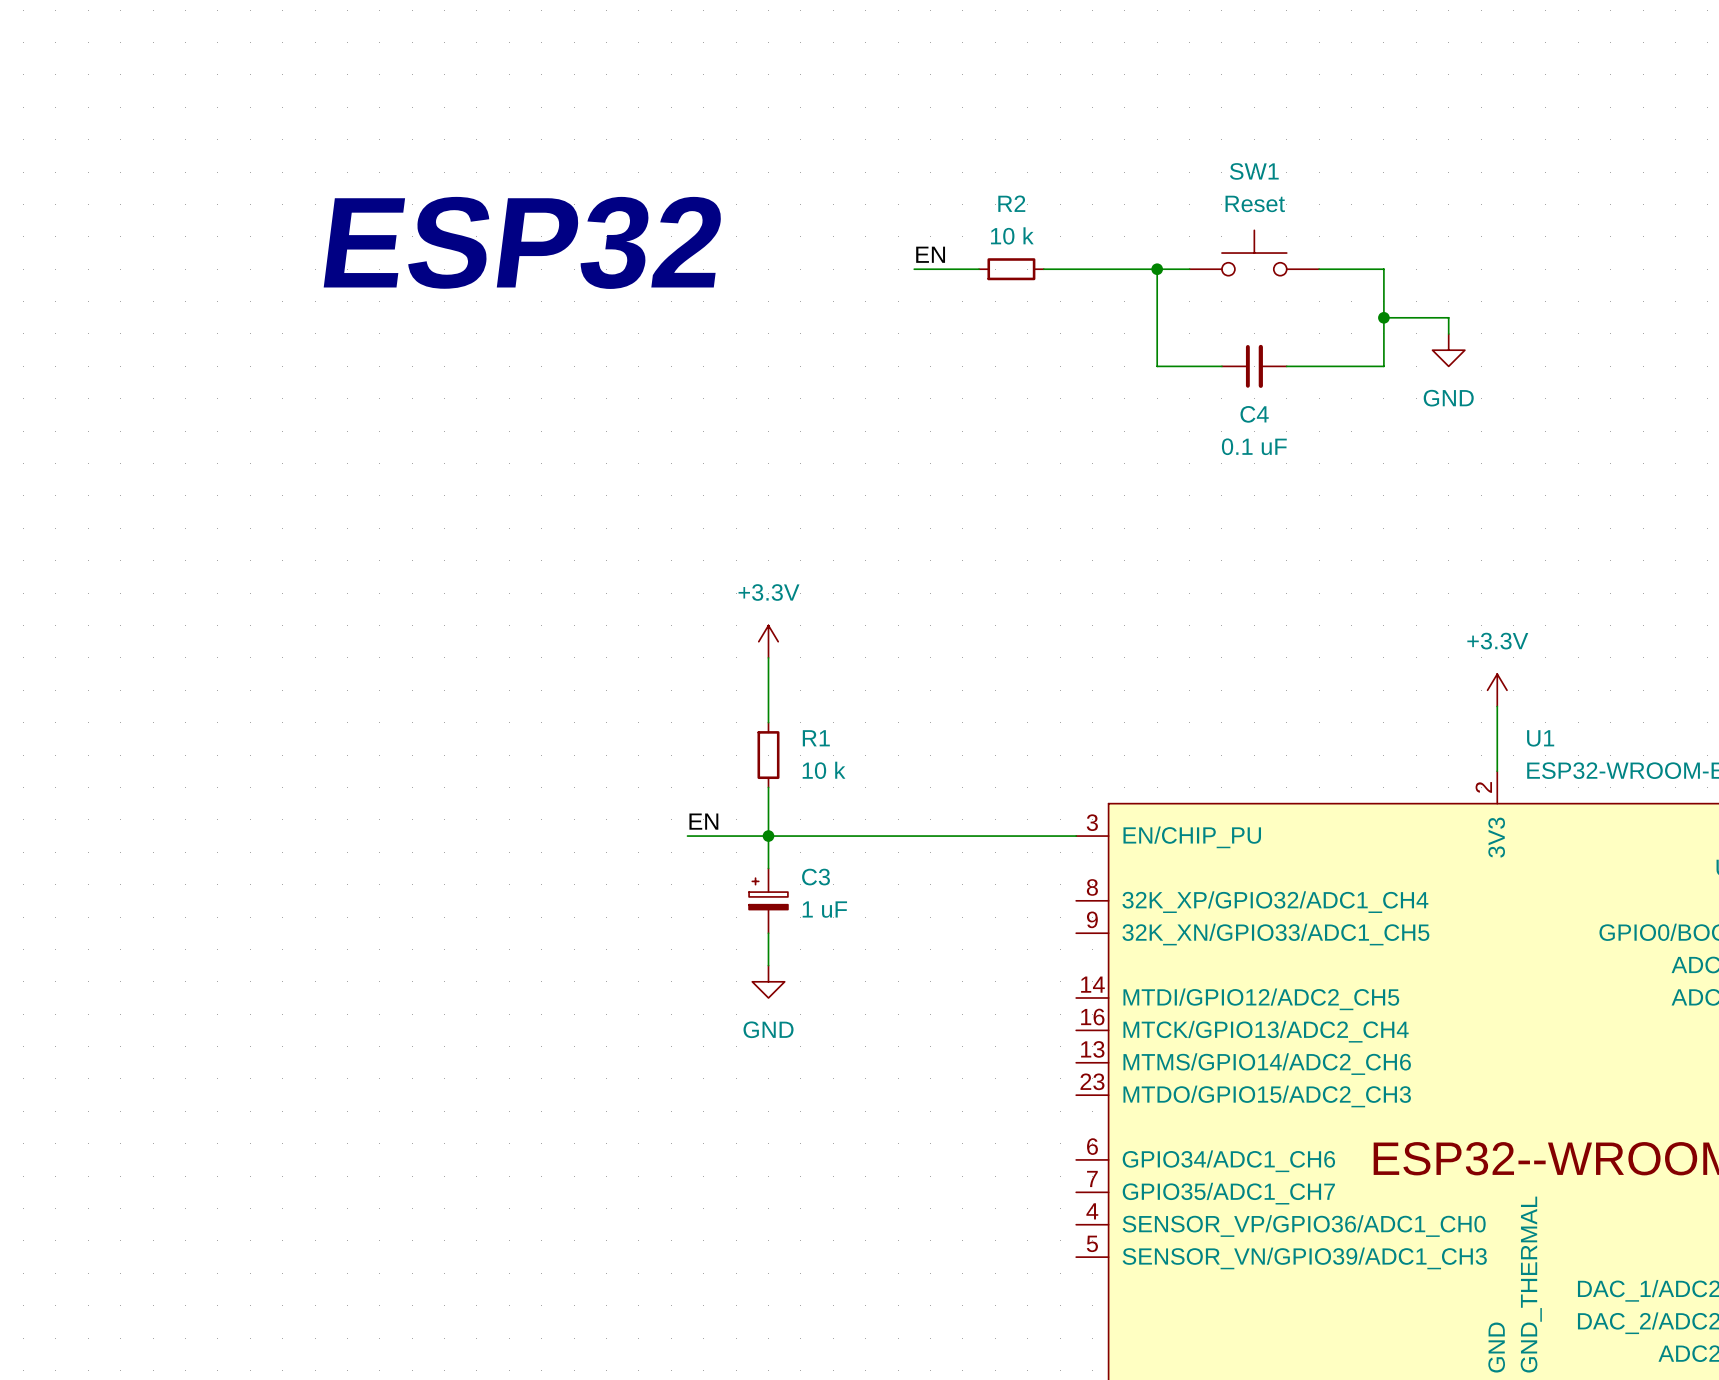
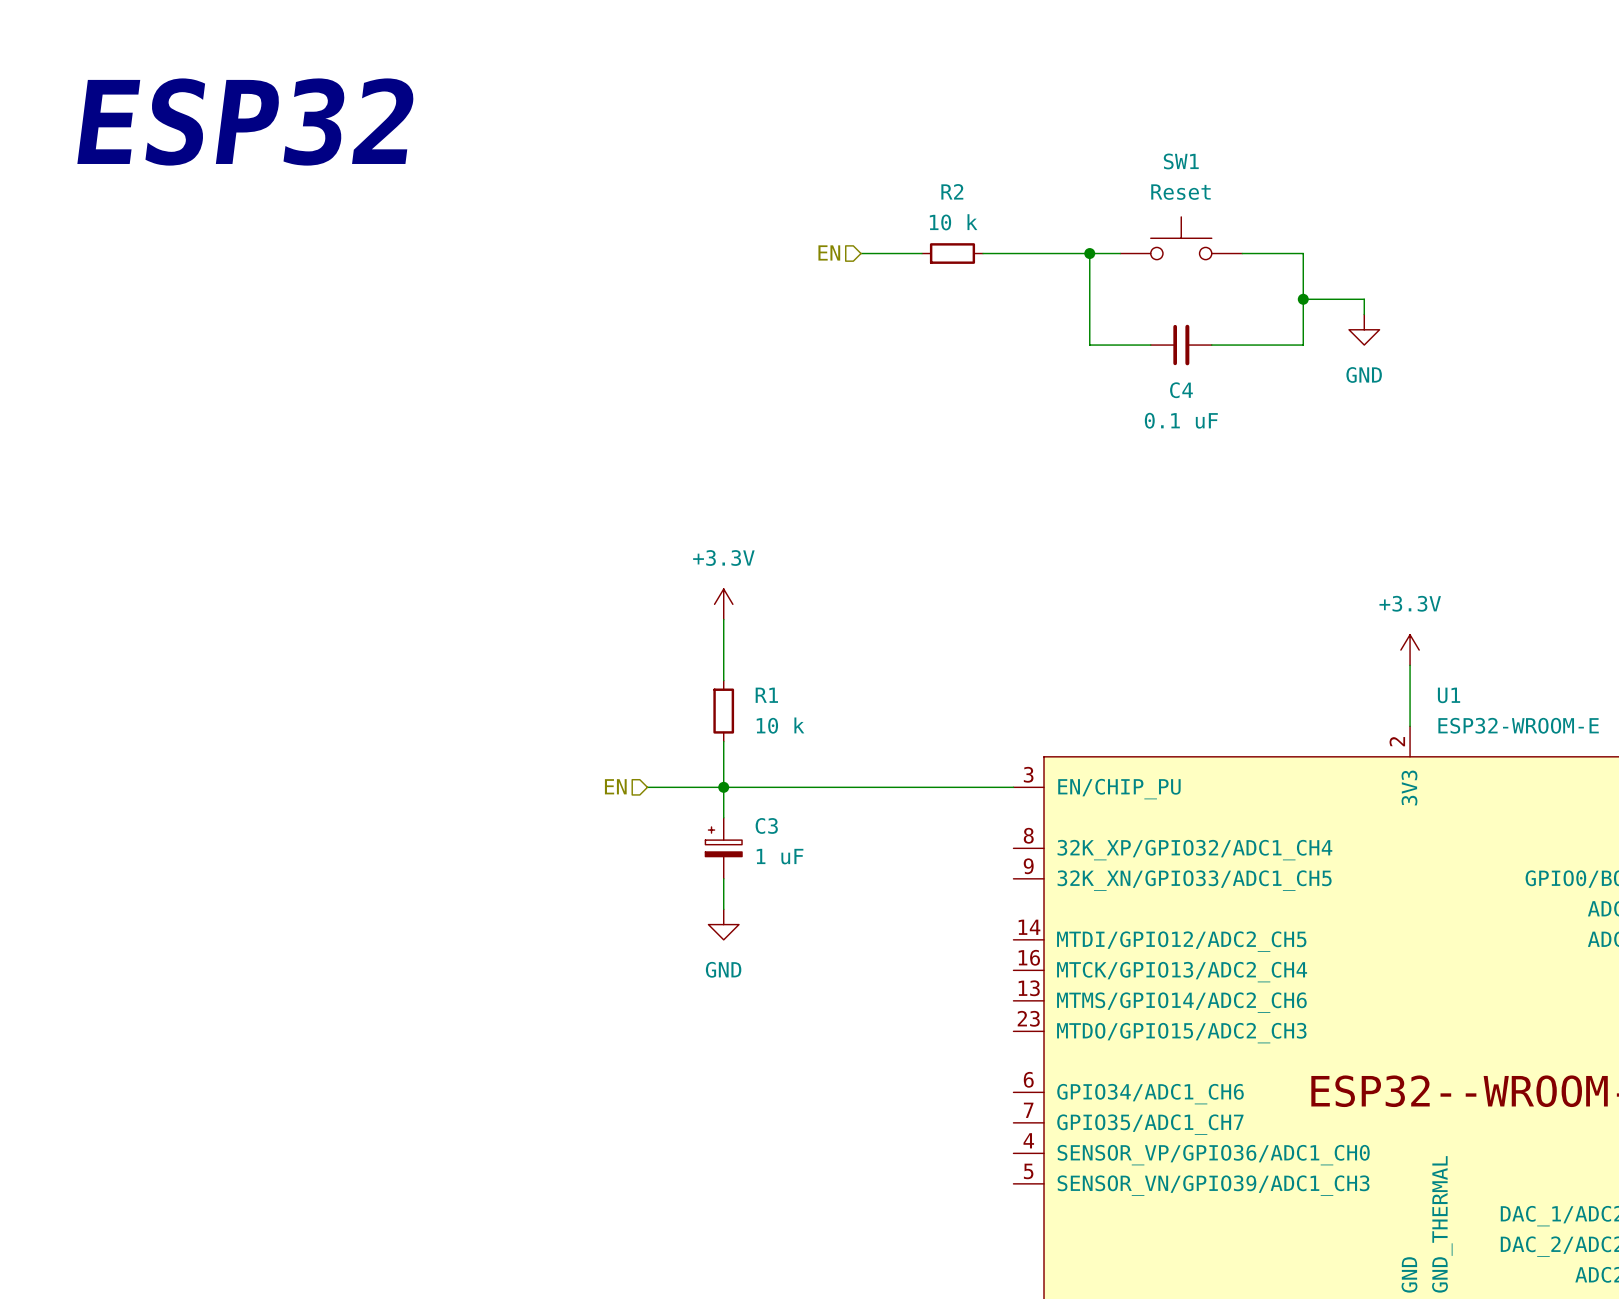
text position: ESP32 (522, 242) -> ESP32 (245, 122)
label: EN (930, 254) -> none
hierarchical label: none -> EN (829, 252)
label: EN (703, 821) -> none
hierarchical label: none -> EN (615, 786)

